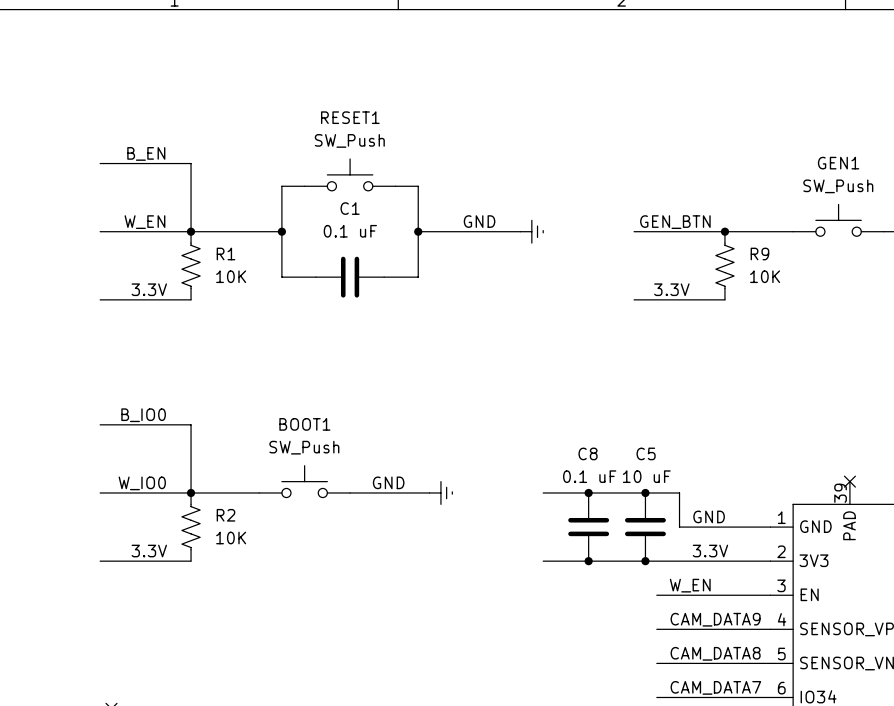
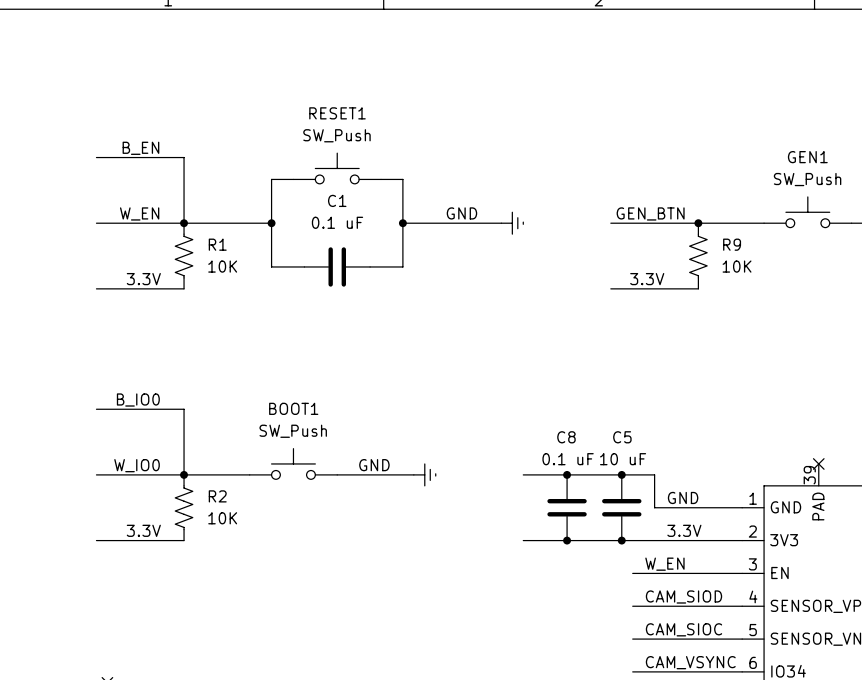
label: CAM_DATA9 (715, 619) -> CAM_SIOD (683, 597)
label: CAM_DATA8 (715, 653) -> CAM_SIOC (683, 629)
label: CAM_DATA7 (715, 687) -> CAM_VSYNC (690, 662)

